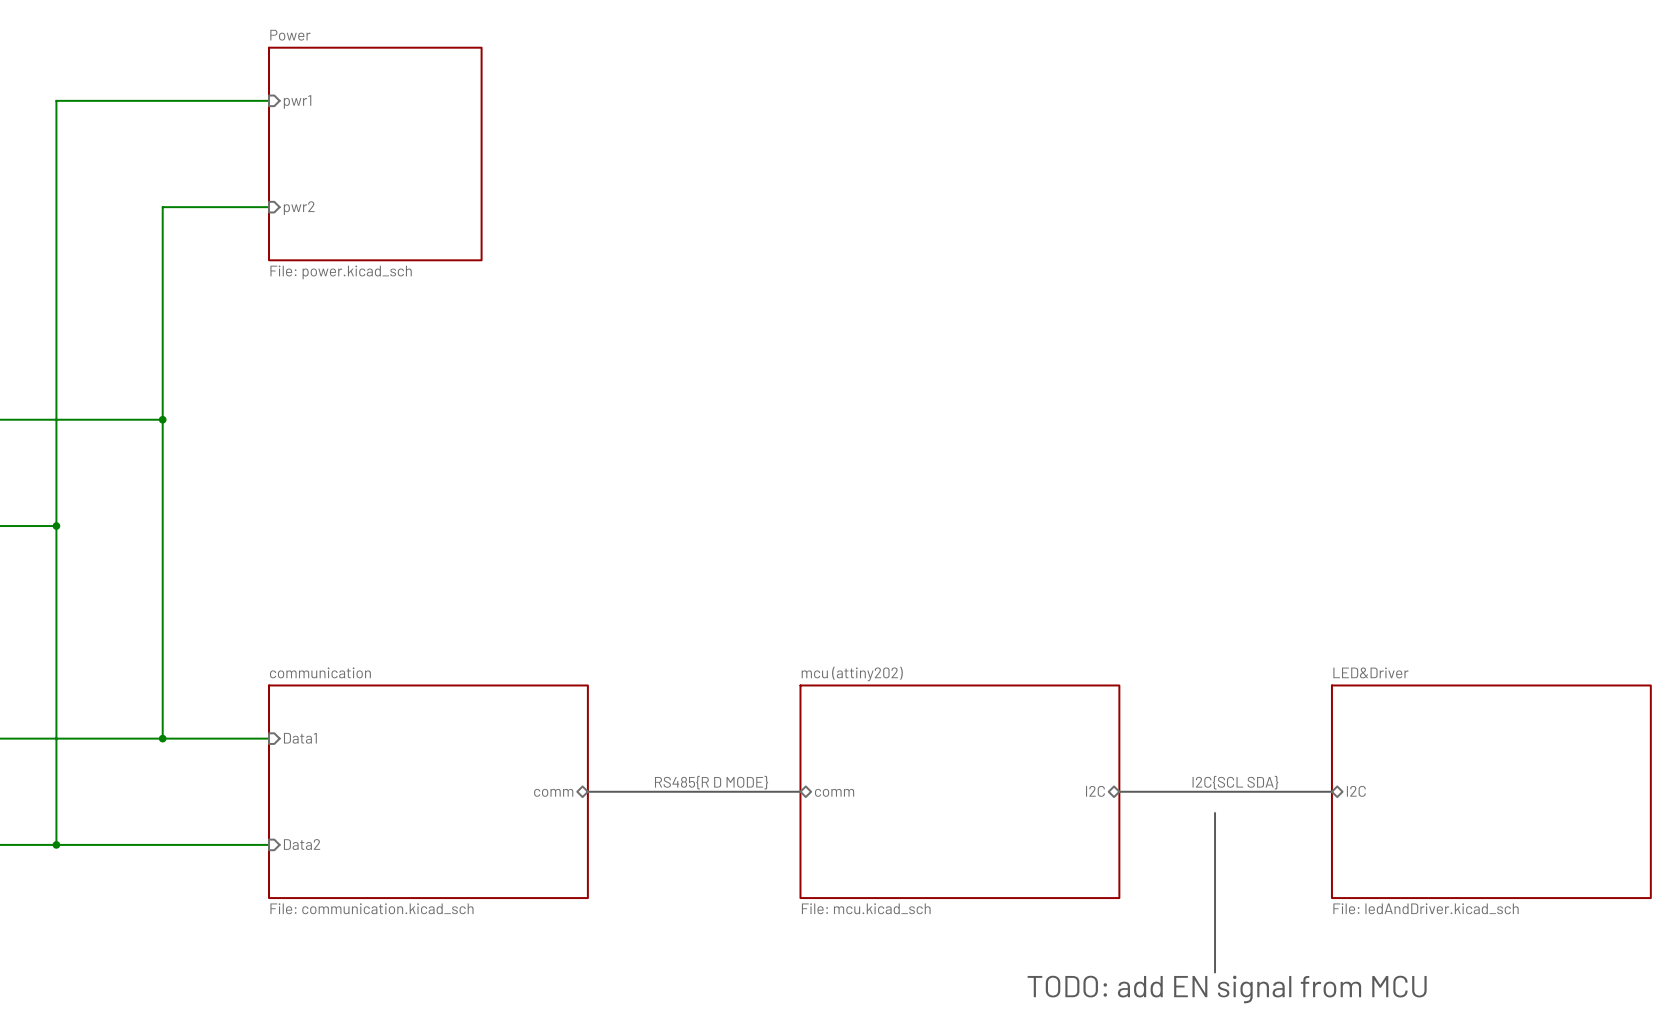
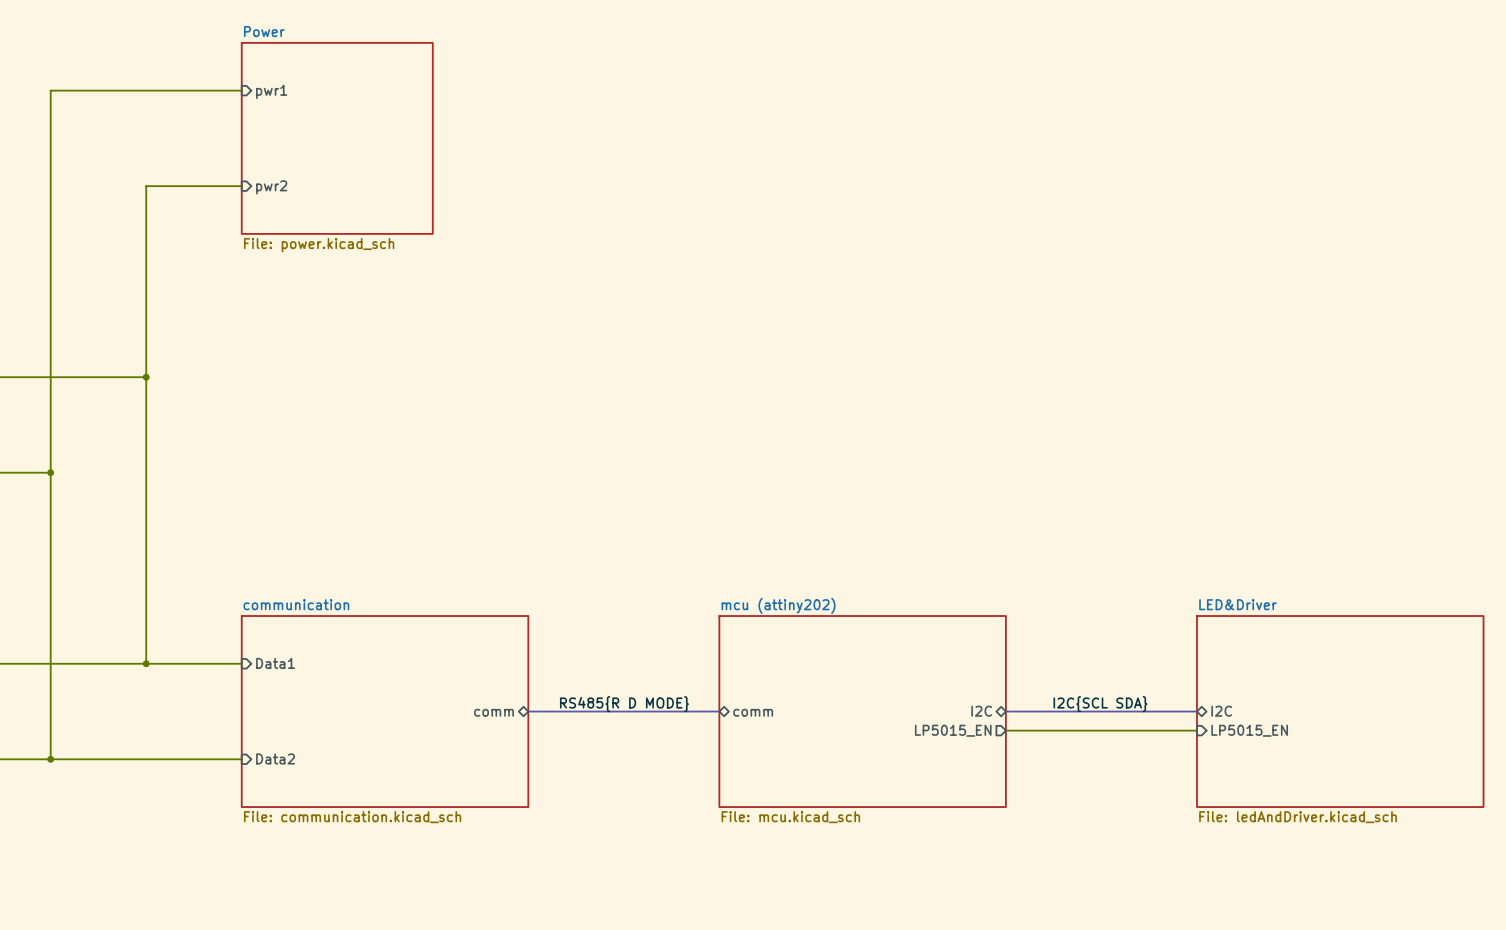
sheet pin: none -> LP5015_EN (953, 730)
sheet pin: none -> LP5015_EN (1249, 730)
wire: none -> (1005, 730) (1196, 730)
line: (1215, 813) (1215, 972) -> none
text: TODO: add EN signal from MCU (1227, 989) -> none

